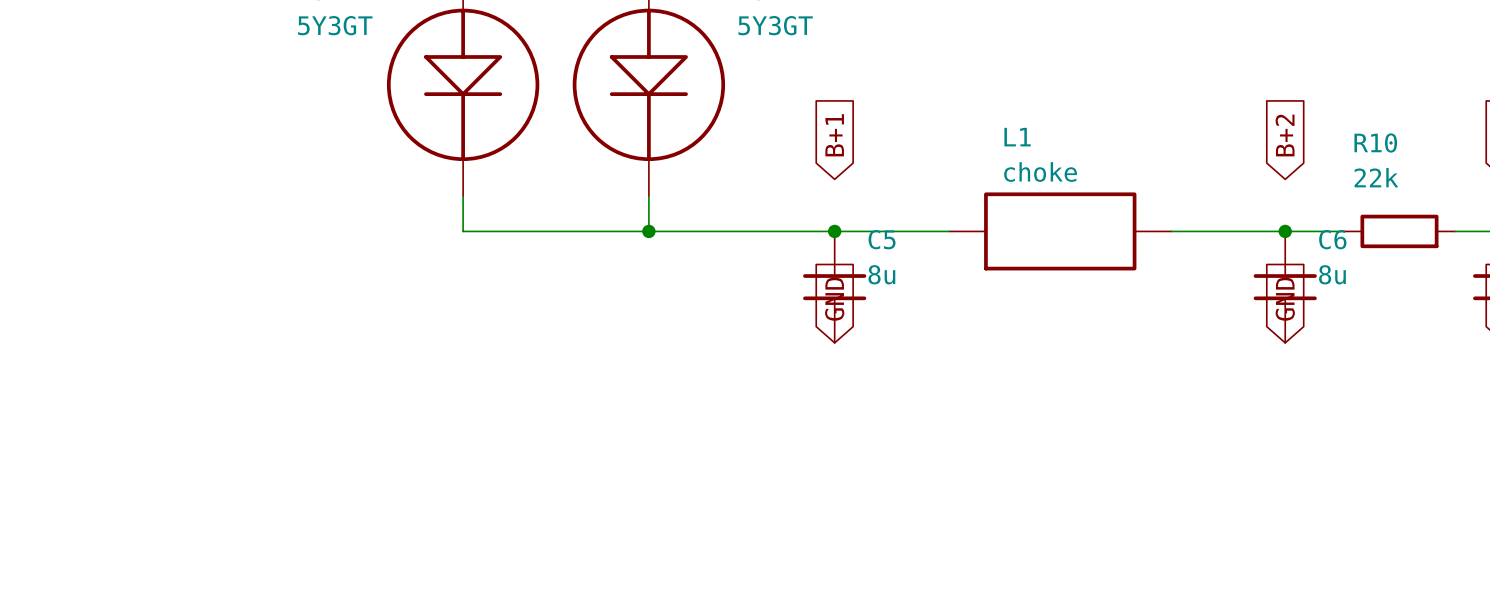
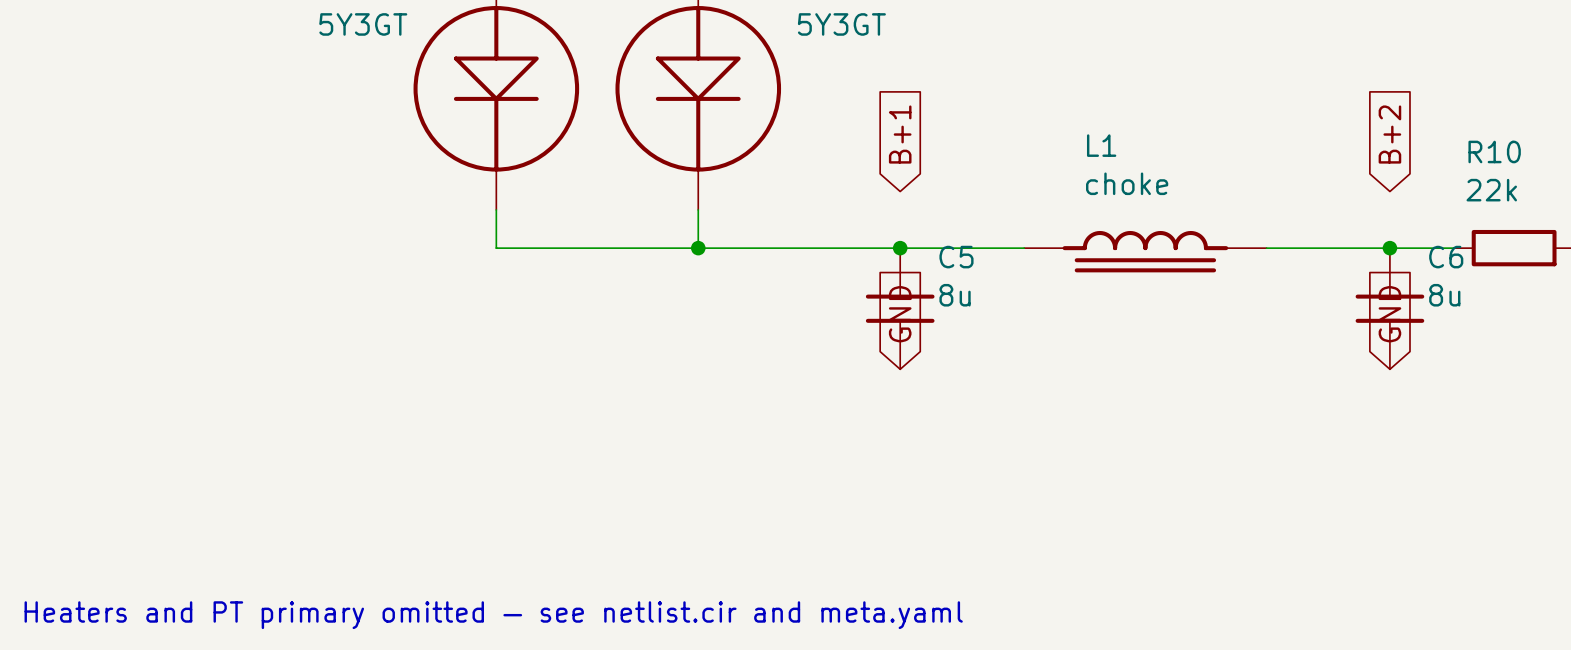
L1 symbol: [948, 192, 1172, 271] -> [1024, 230, 1267, 273]
text: none -> Heaters and PT primary omitted — see netlist.cir and meta.yaml (493, 615)

